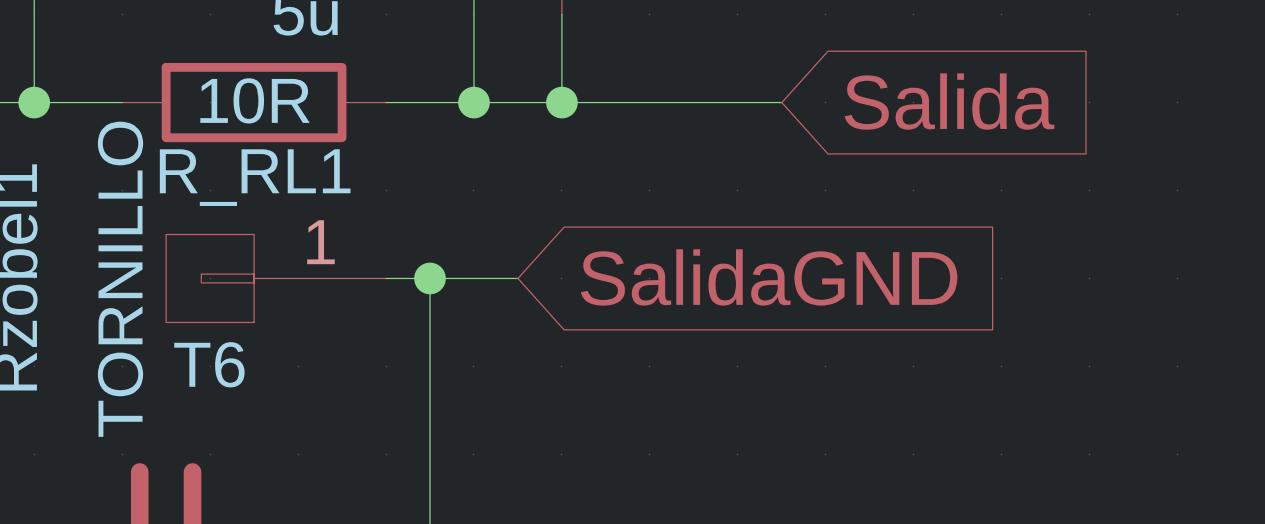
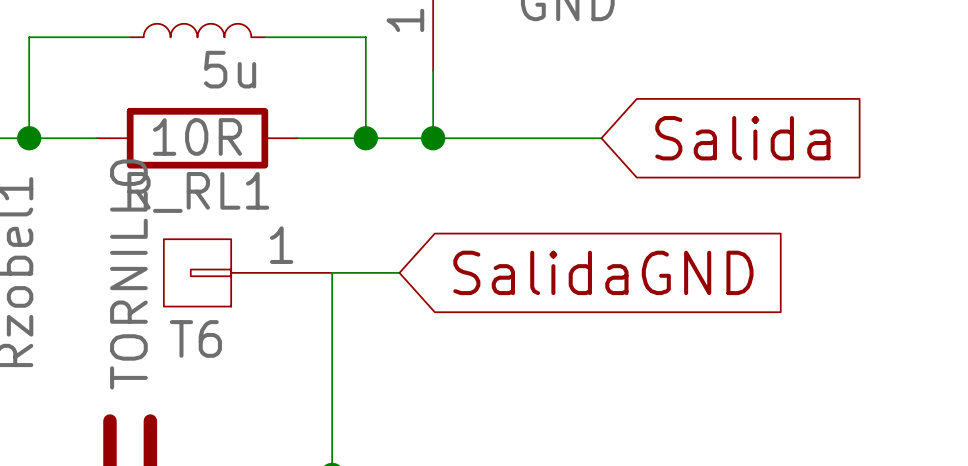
T6 position: (276, 278) -> (248, 272)
junction: (430, 278) -> none

